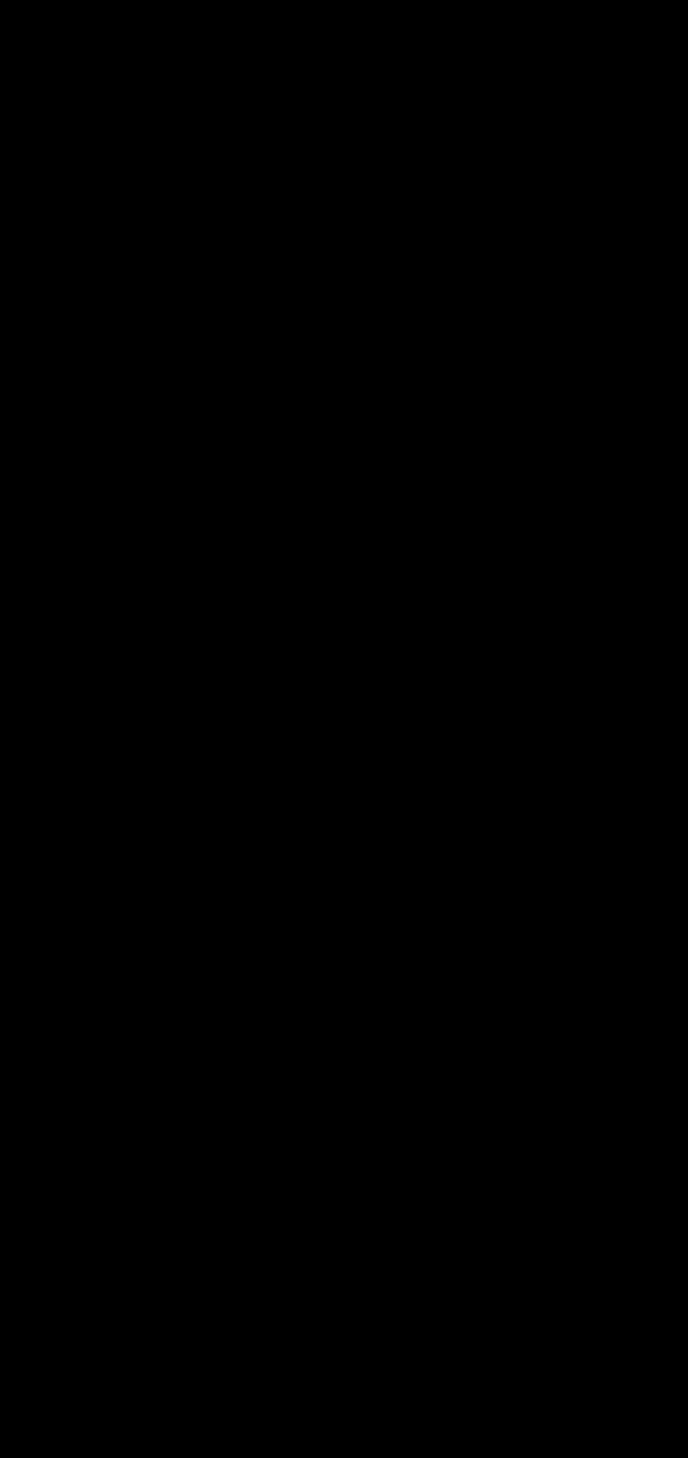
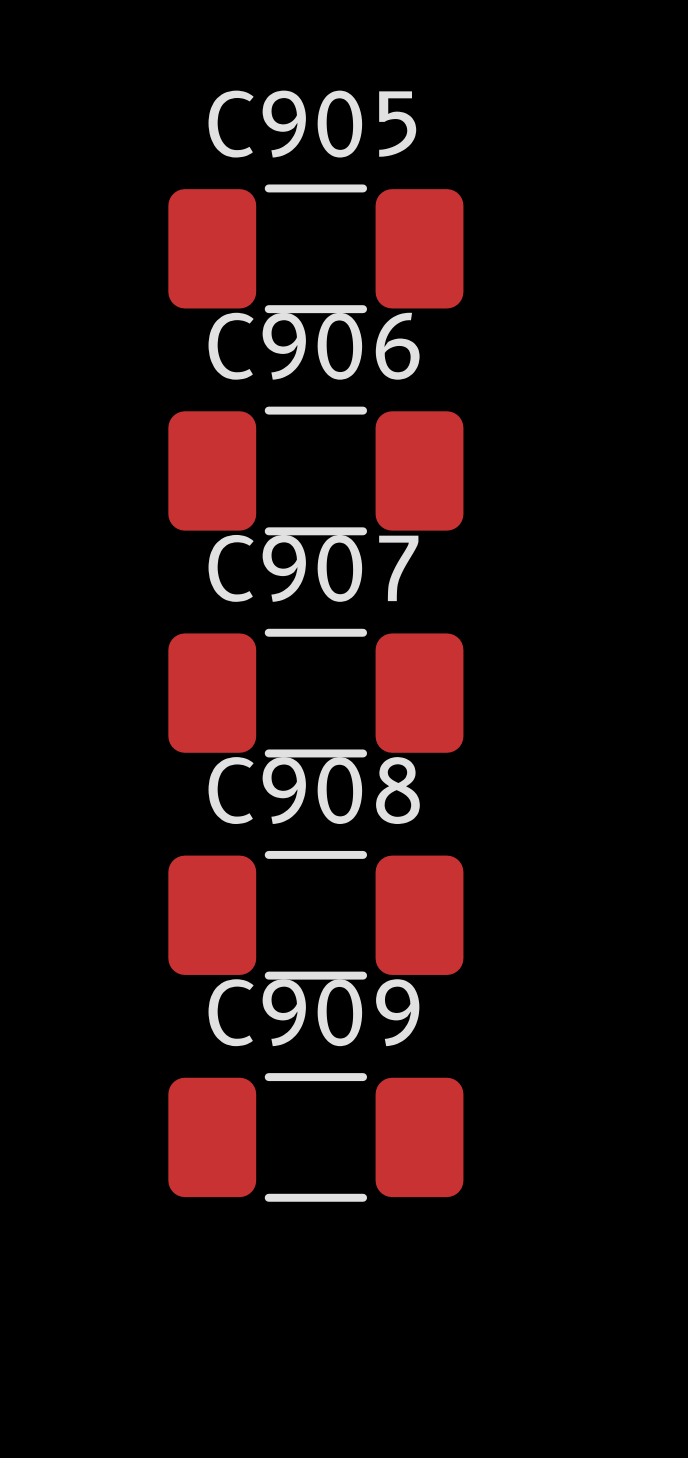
C905: none -> (315, 248)
C906: none -> (315, 470)
C907: none -> (315, 693)
C908: none -> (315, 915)
C909: none -> (315, 1137)

